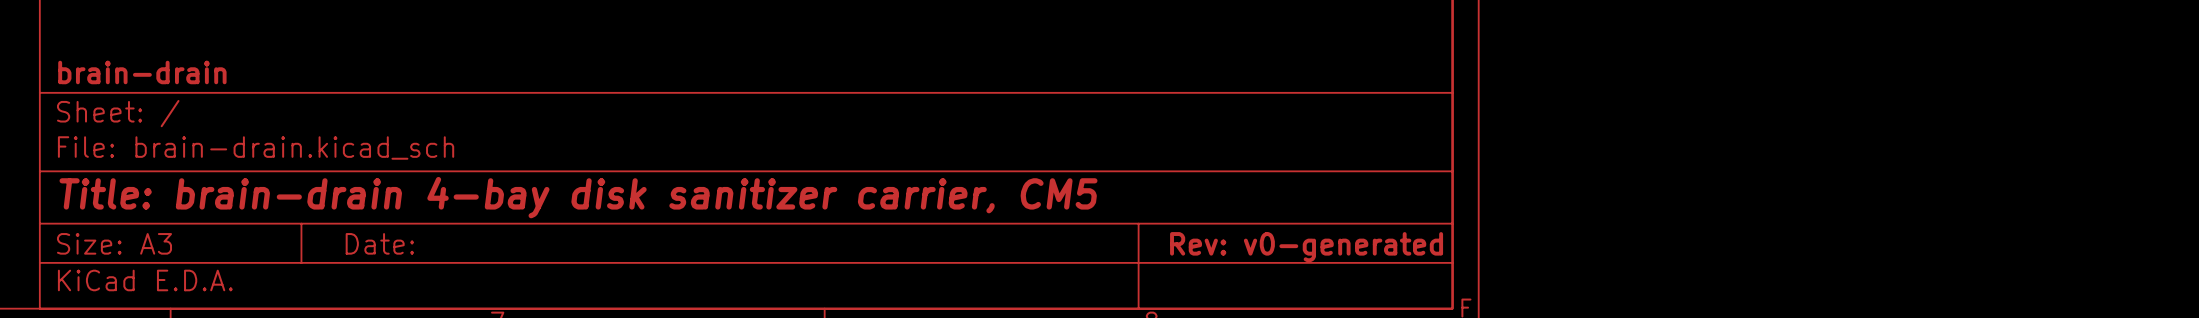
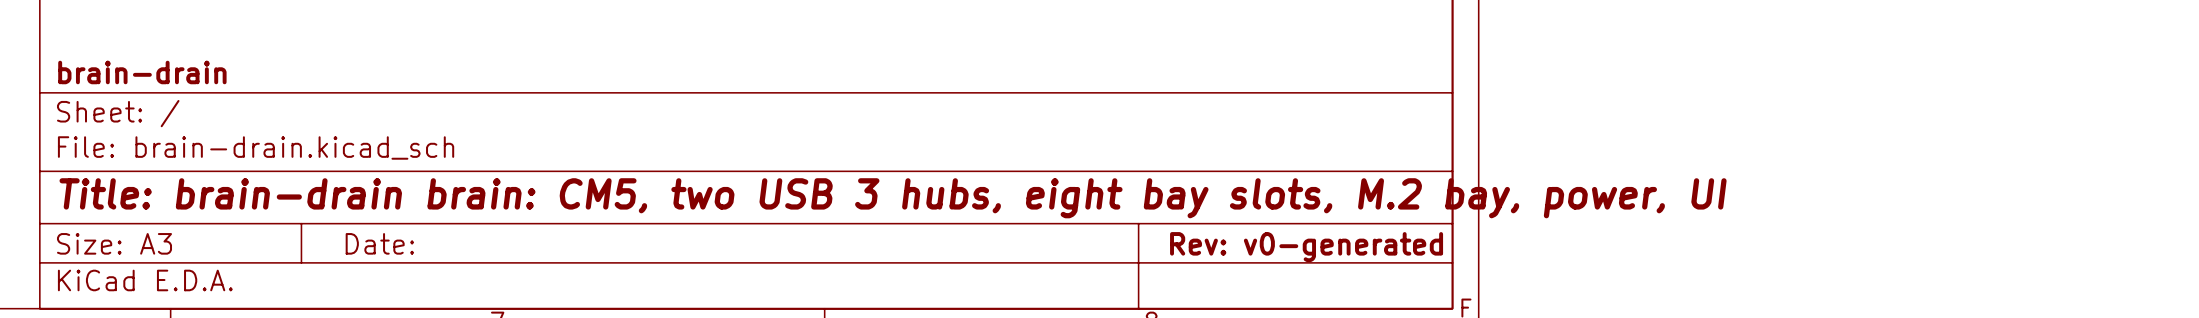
title block: Title: brain-drain 4-bay disk sanitizer carrier, CM5 (578, 197) -> Title: brain-drain brain: CM5, two USB 3 hubs, eight bay slots, M.2 bay, power, UI (893, 198)

